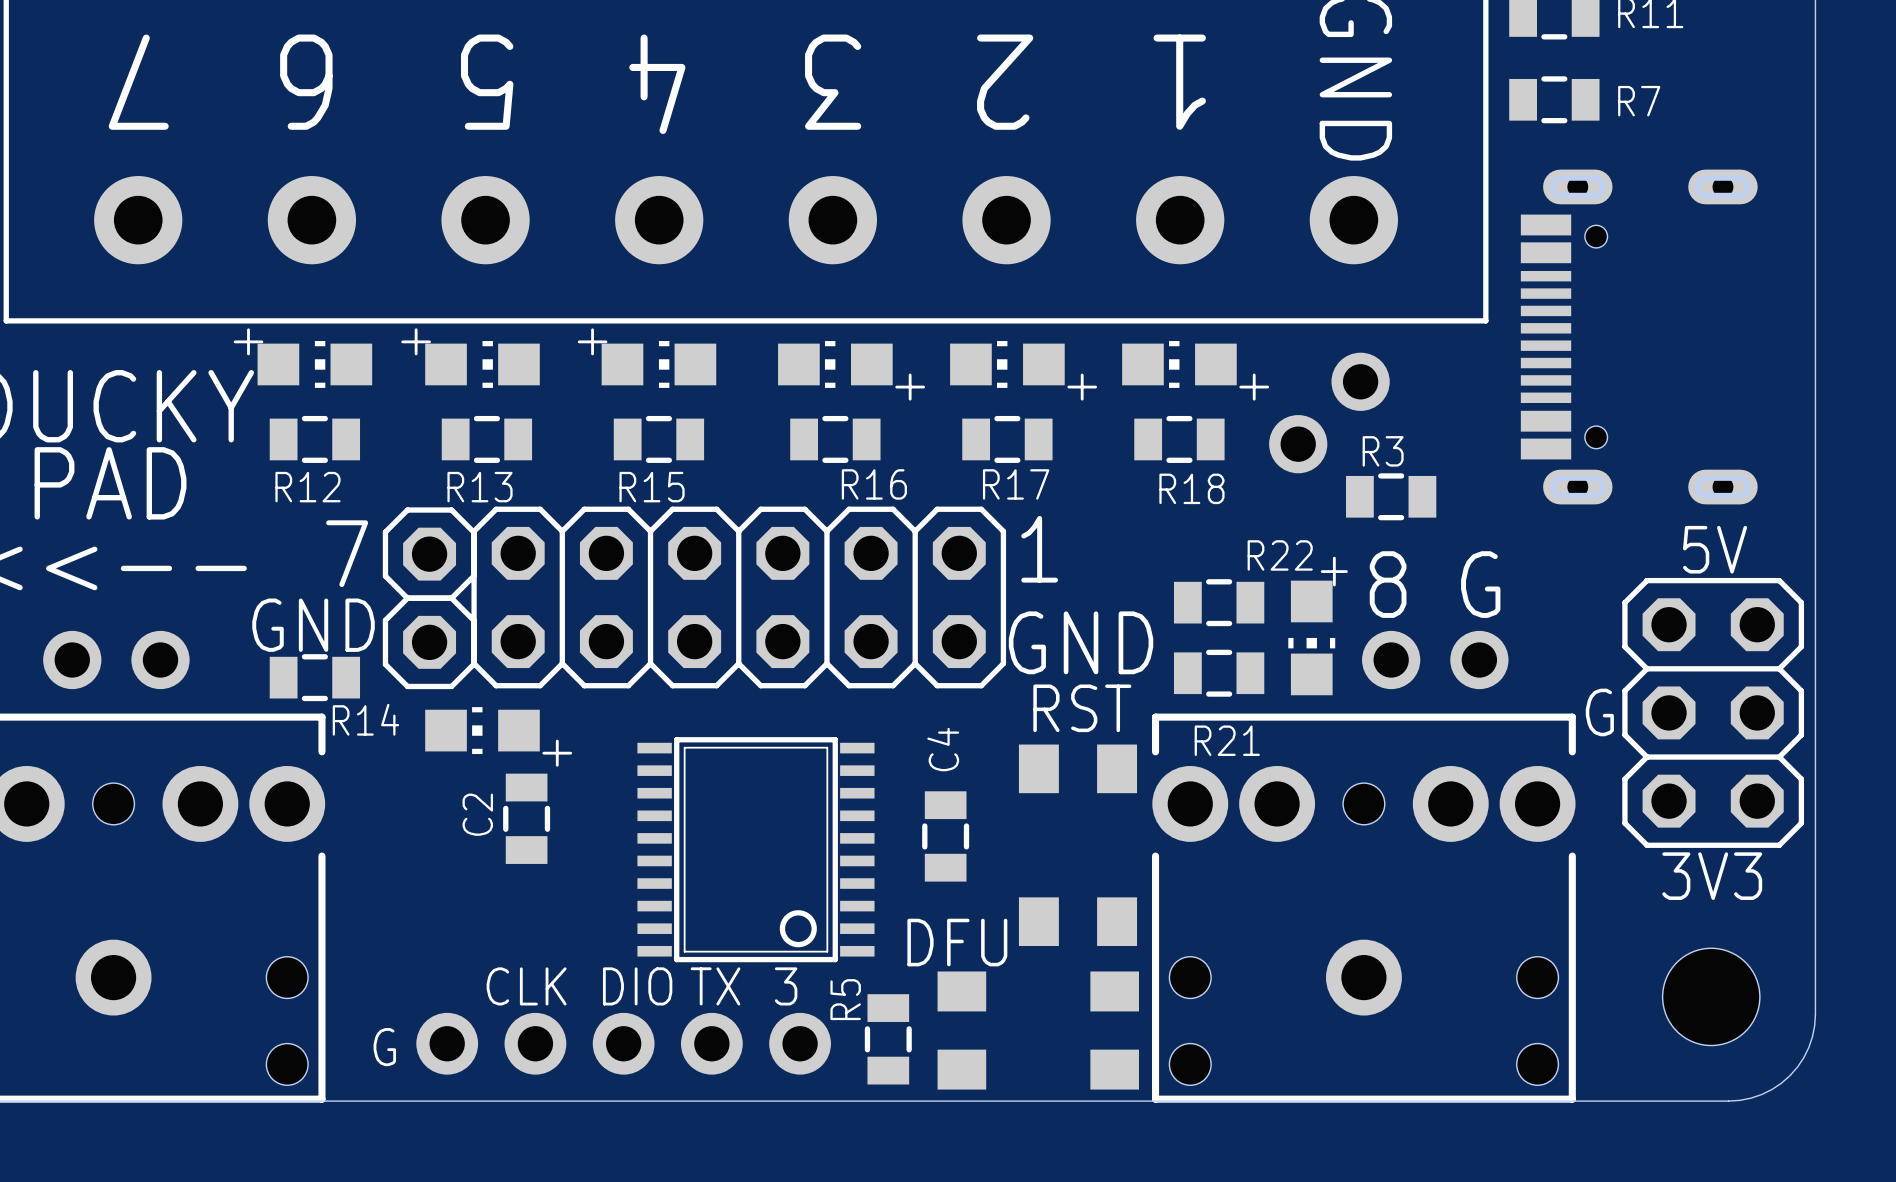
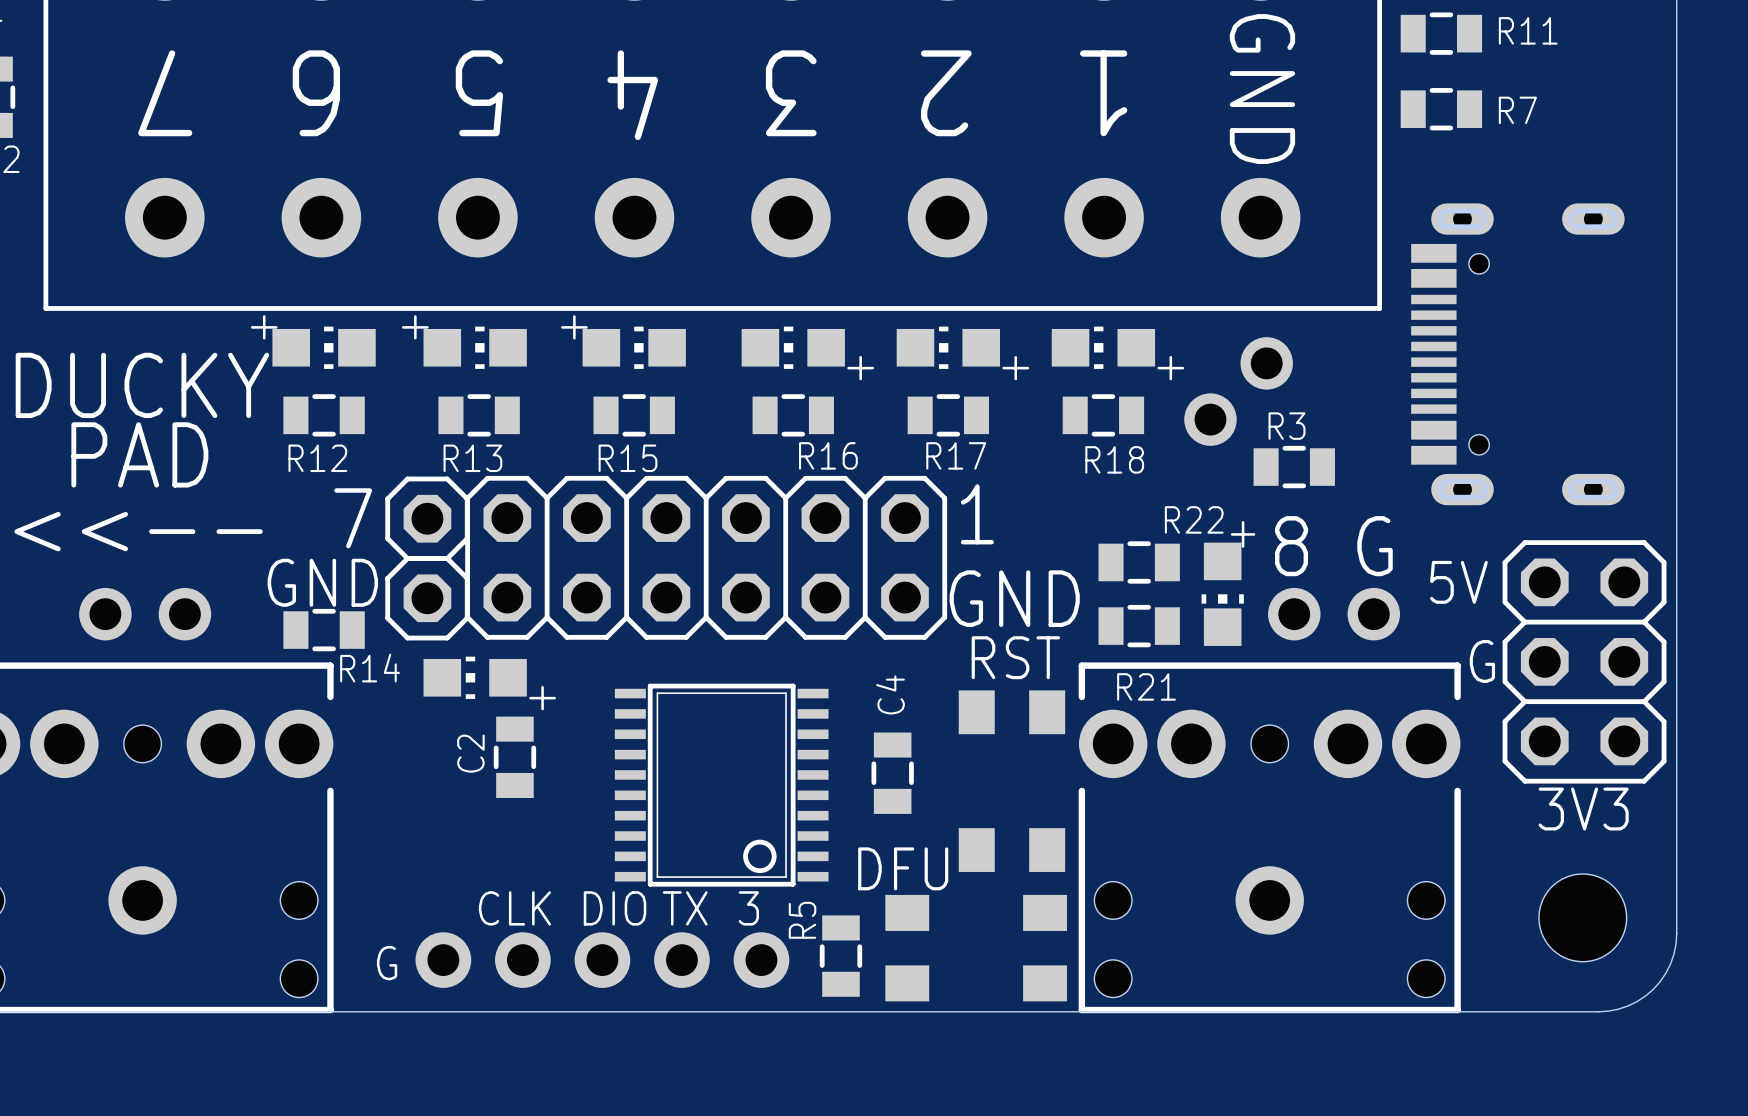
part position: (1639, 336) -> (1517, 354)
text position: 5V (1715, 549) -> 5V (1458, 582)

